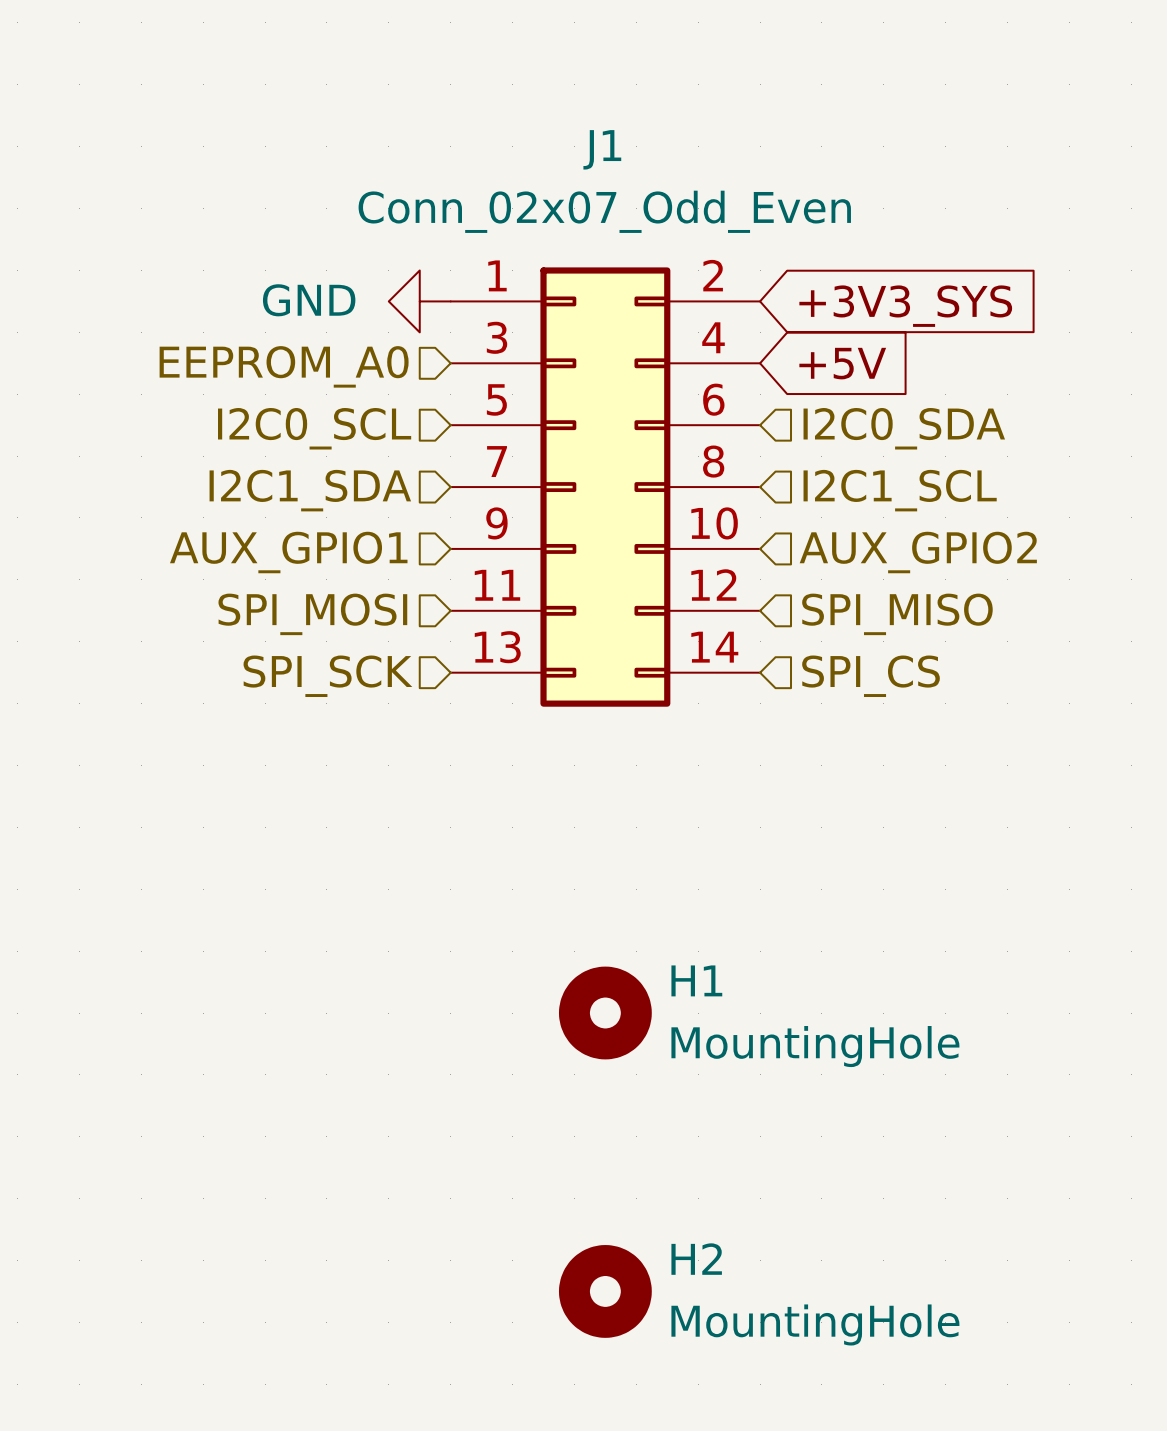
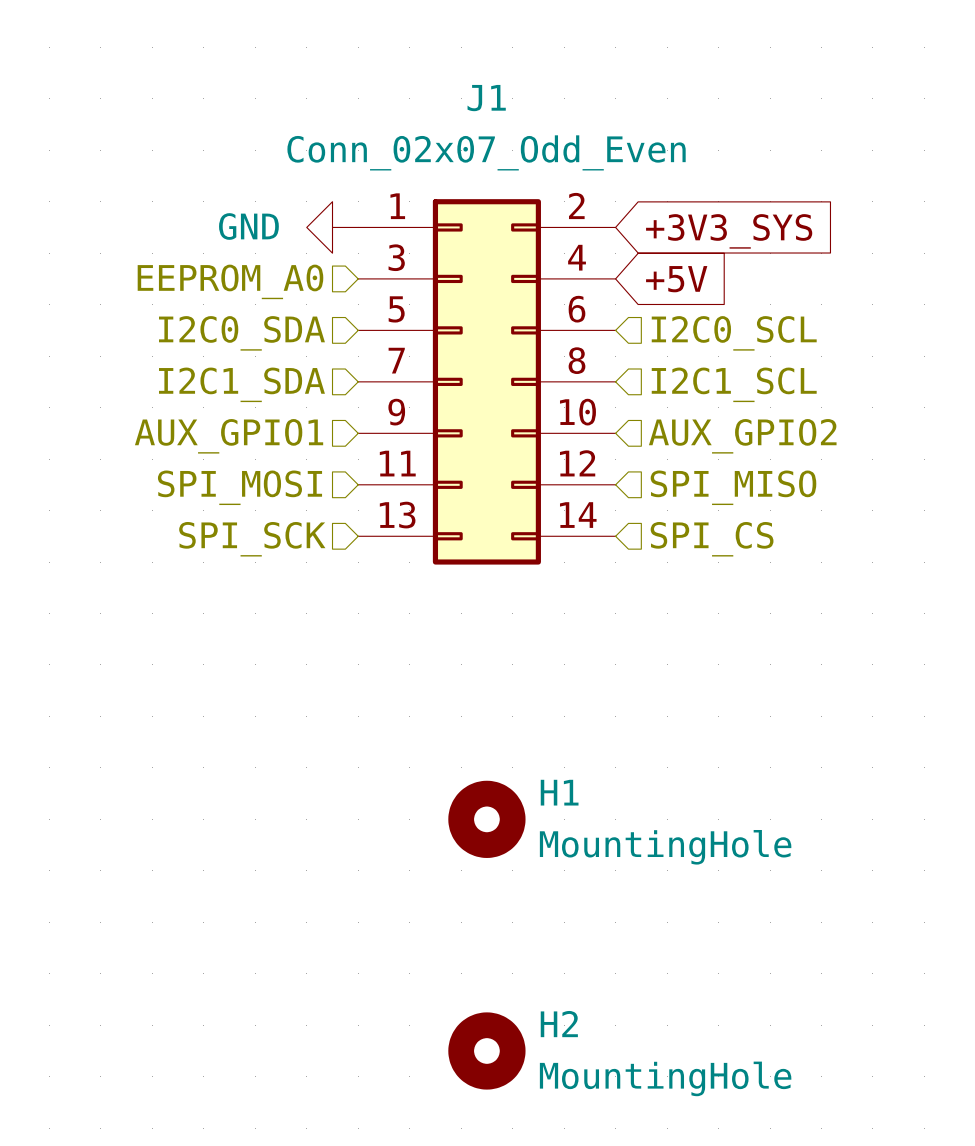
hierarchical label: I2C0_SCL (314, 428) -> I2C0_SDA (241, 333)
hierarchical label: I2C0_SDA (904, 428) -> I2C0_SCL (734, 333)

